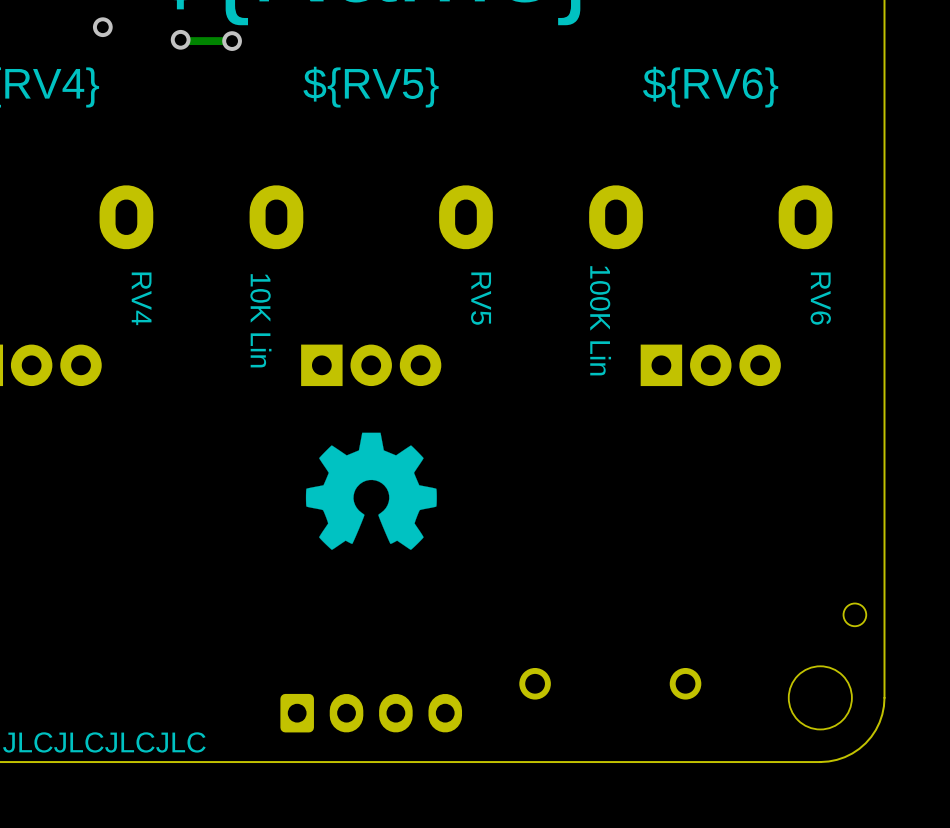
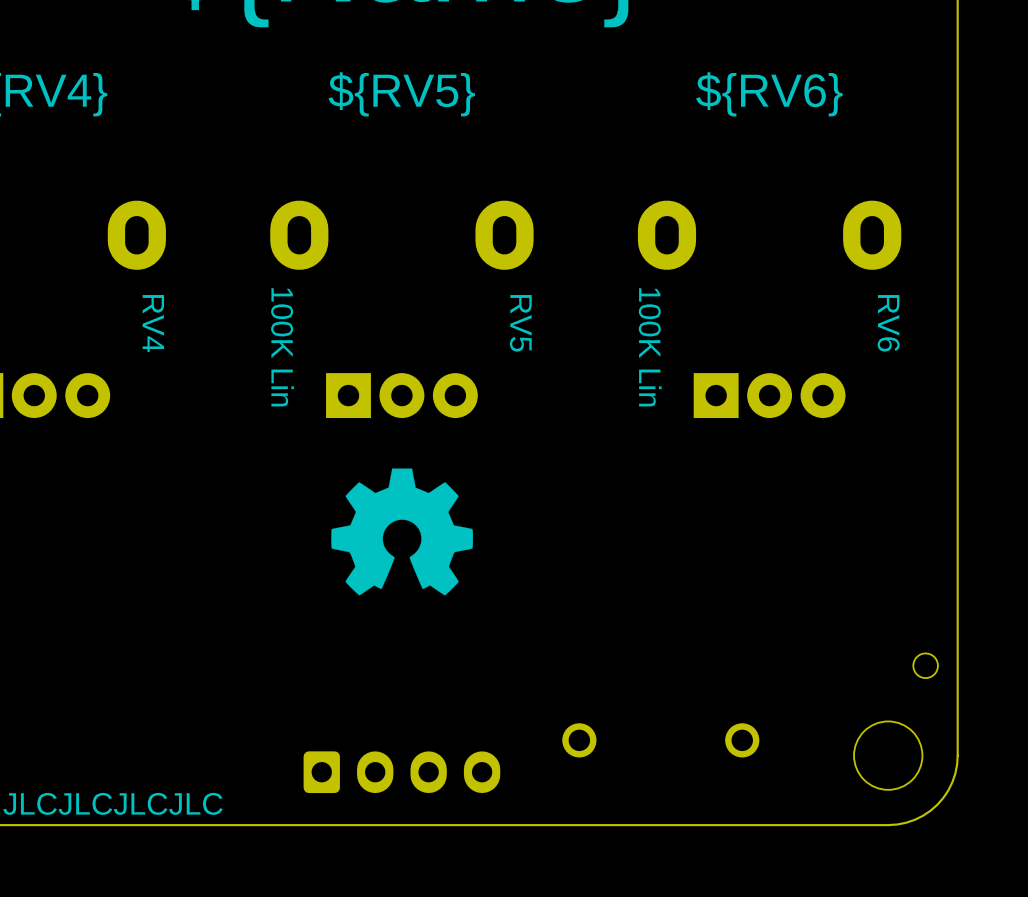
via: (102, 27) -> none
track: (180, 39) (232, 41) -> none
via: (180, 39) -> none
via: (232, 41) -> none
RV5 value: 10K Lin (260, 320) -> 100K Lin (282, 347)

